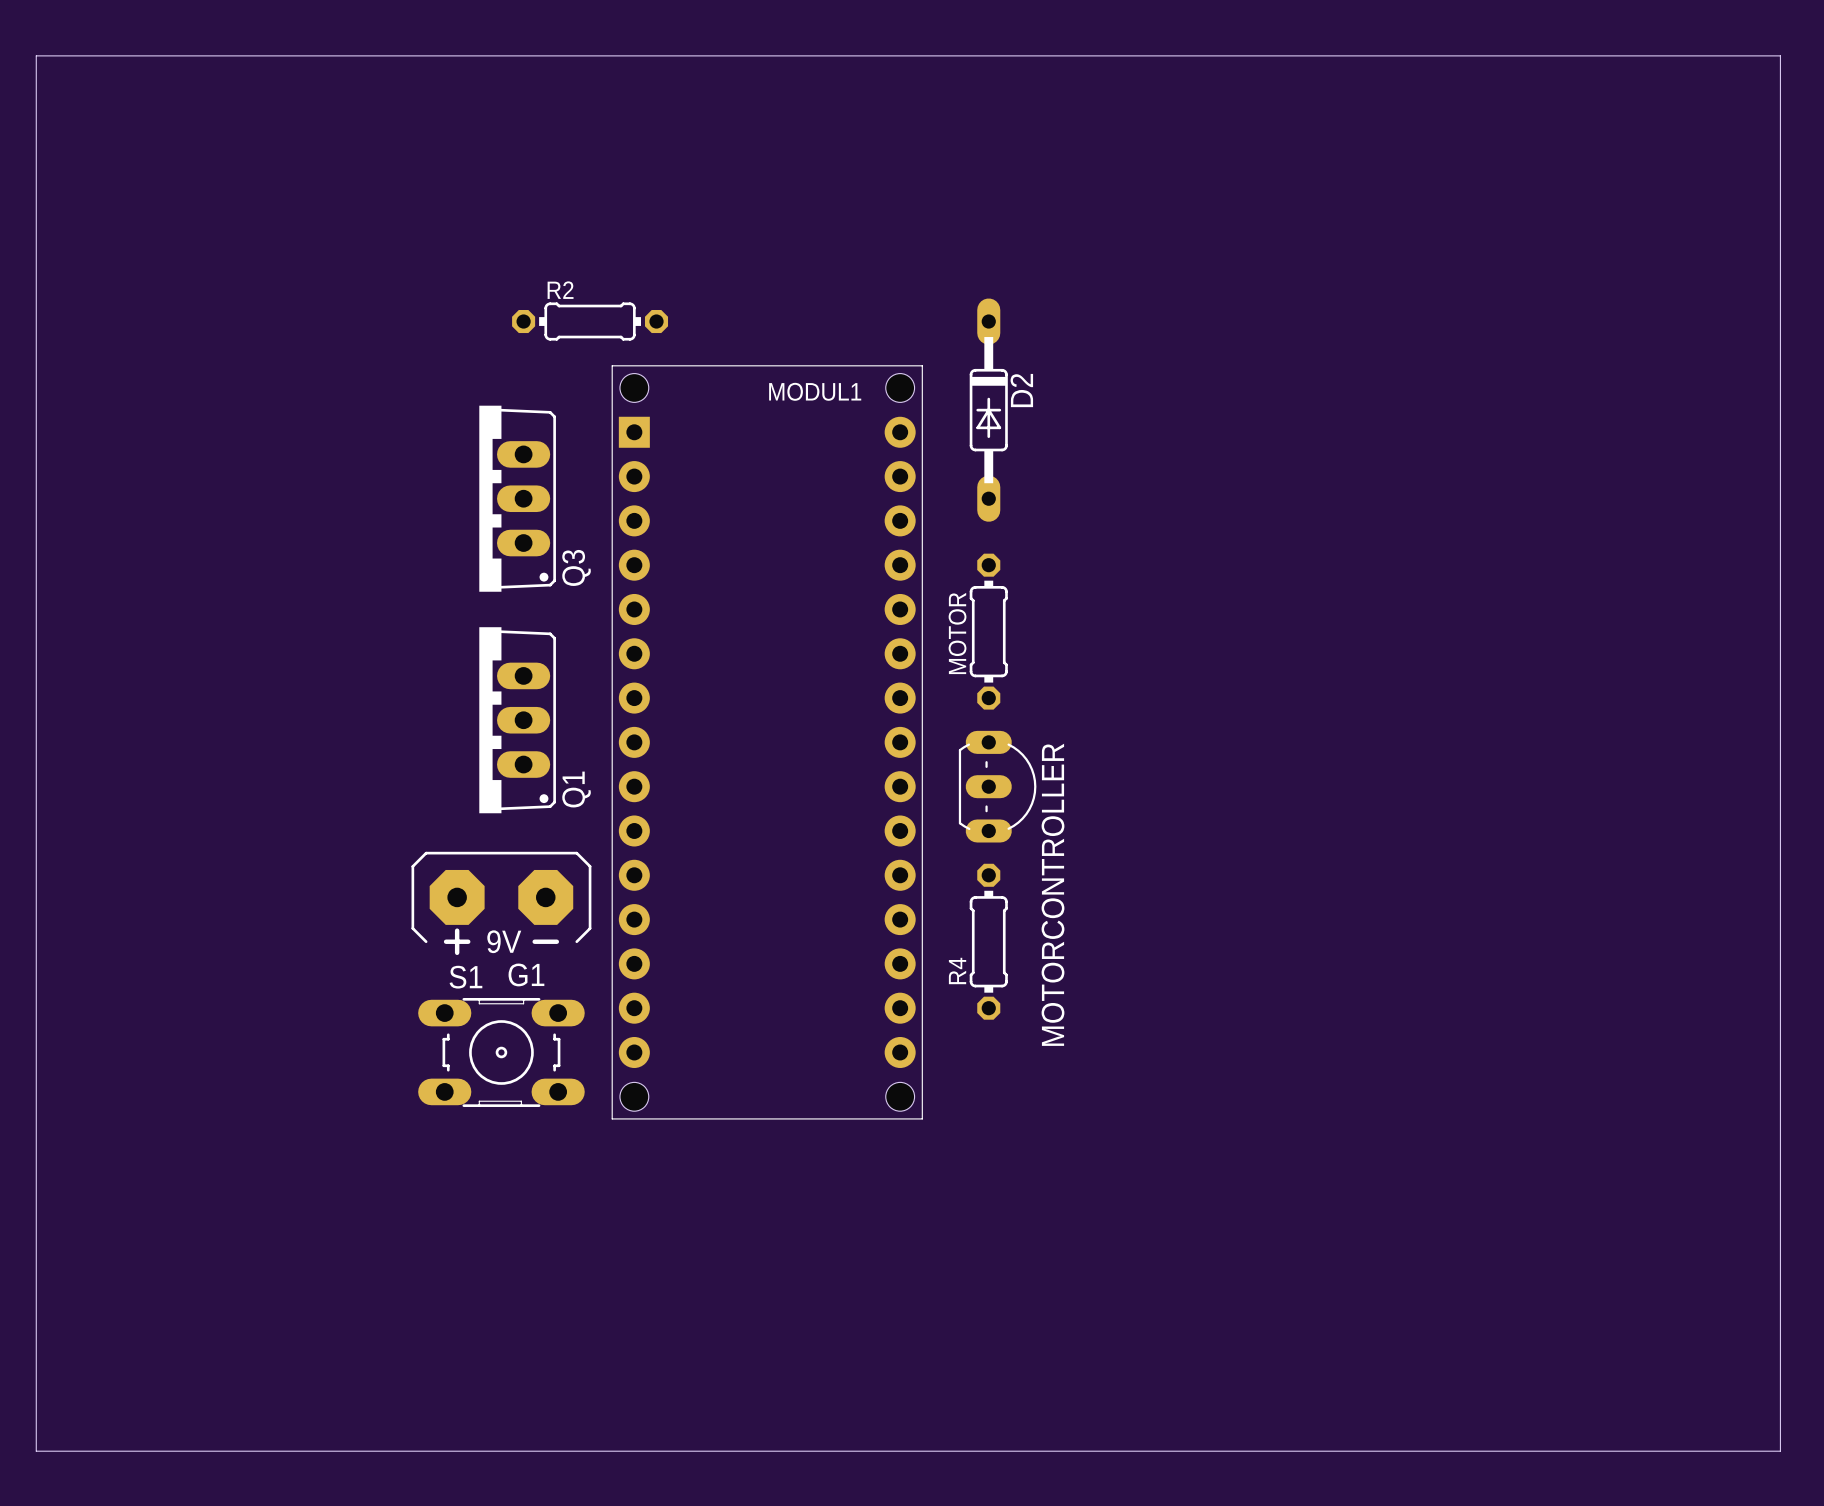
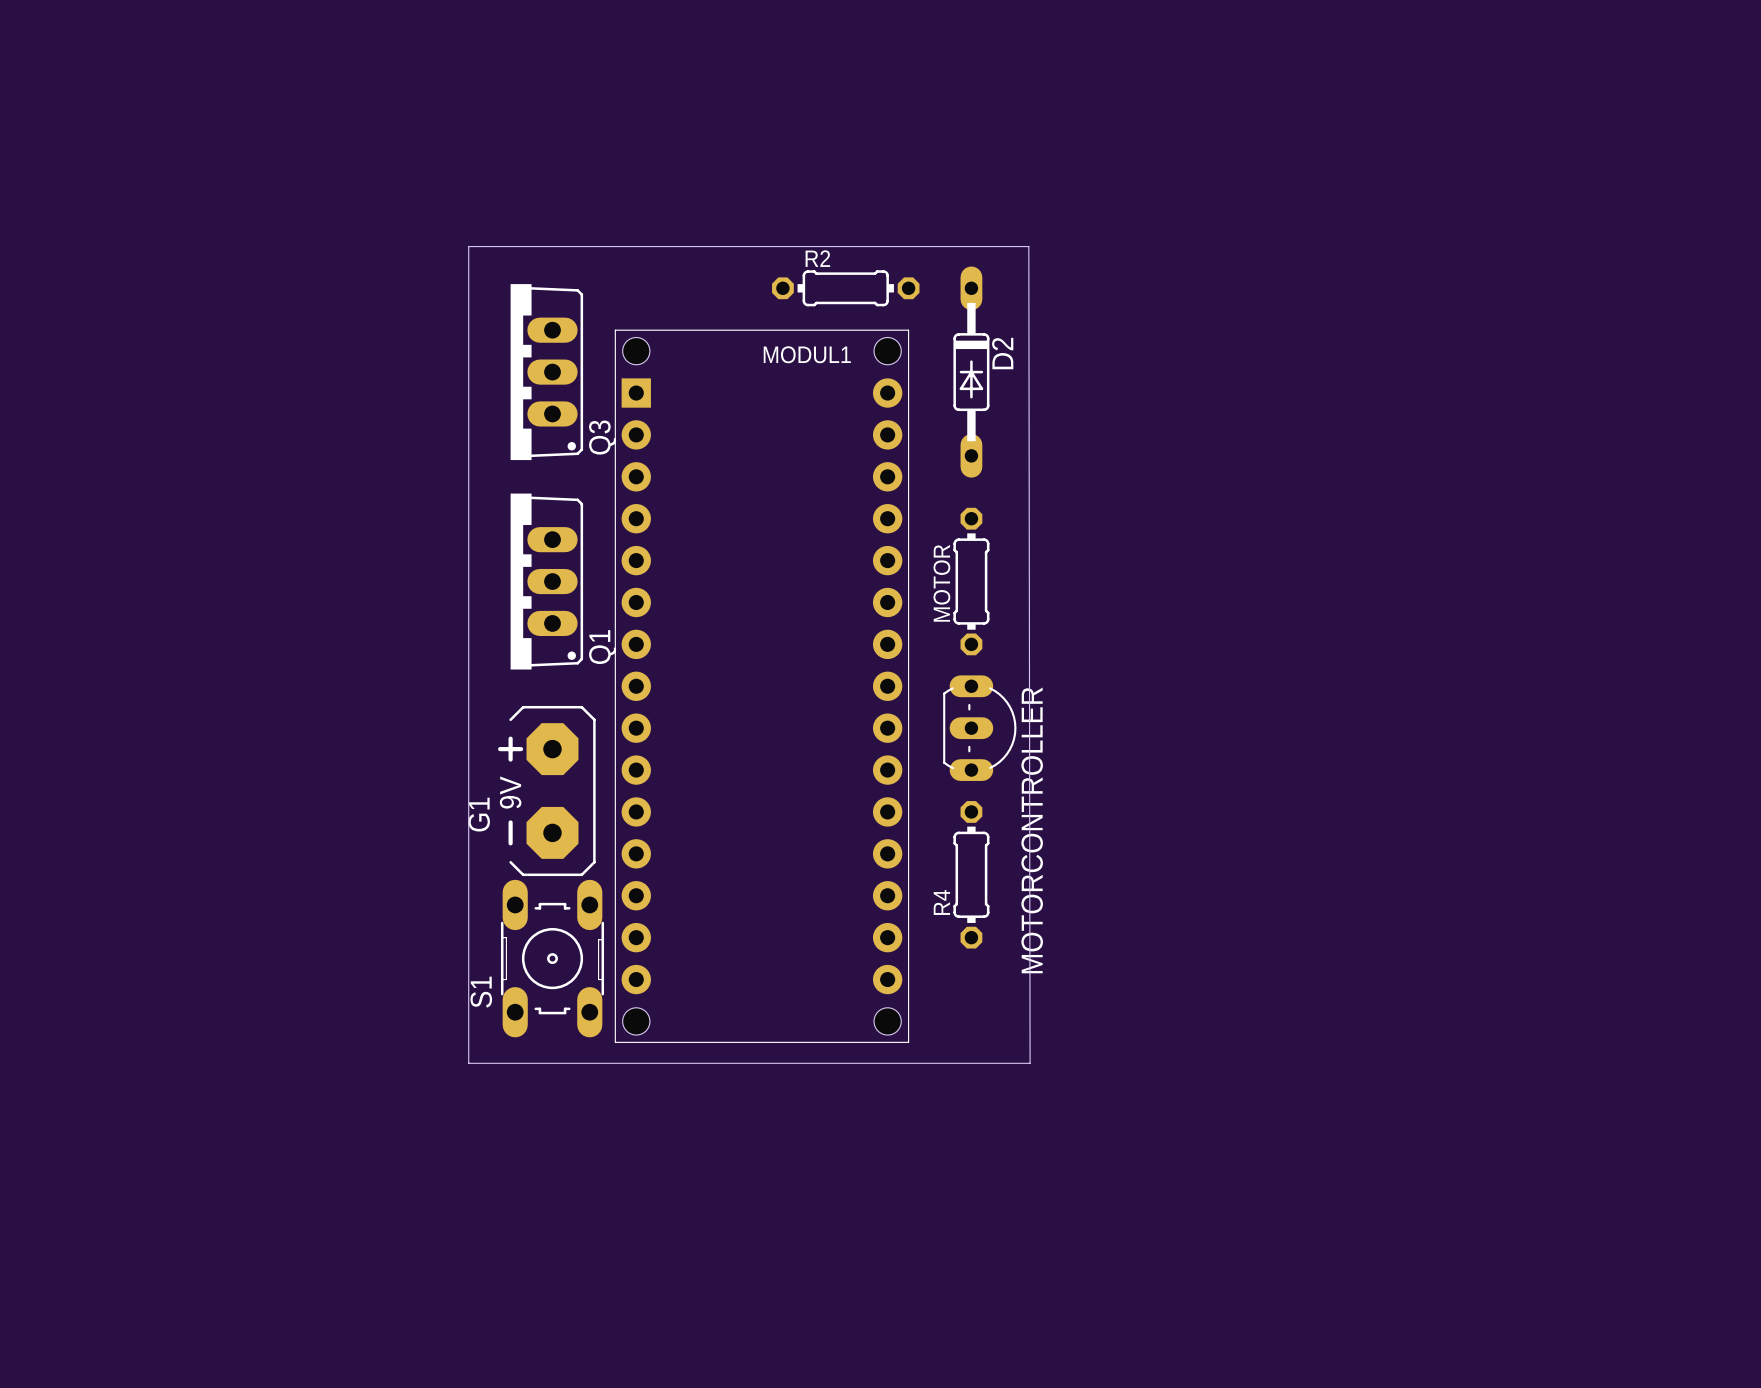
board edge: (36, 55) (1780, 55) (1780, 1451) (36, 1451) (36, 55) -> none
board edge: none -> (468, 246) (1028, 246) (1030, 1063) (468, 1063) (468, 246)
R2 position: (590, 321) -> (845, 288)
Q3 position: (517, 498) -> (546, 372)
Q1 position: (517, 720) -> (546, 581)
G1 footprint: [411, 851, 592, 956] -> [498, 705, 596, 877]
G1 name position: G1 (526, 974) -> G1 (479, 814)
S1 rotation: 0° (501, 1052) -> 90° counterclockwise (552, 958)

